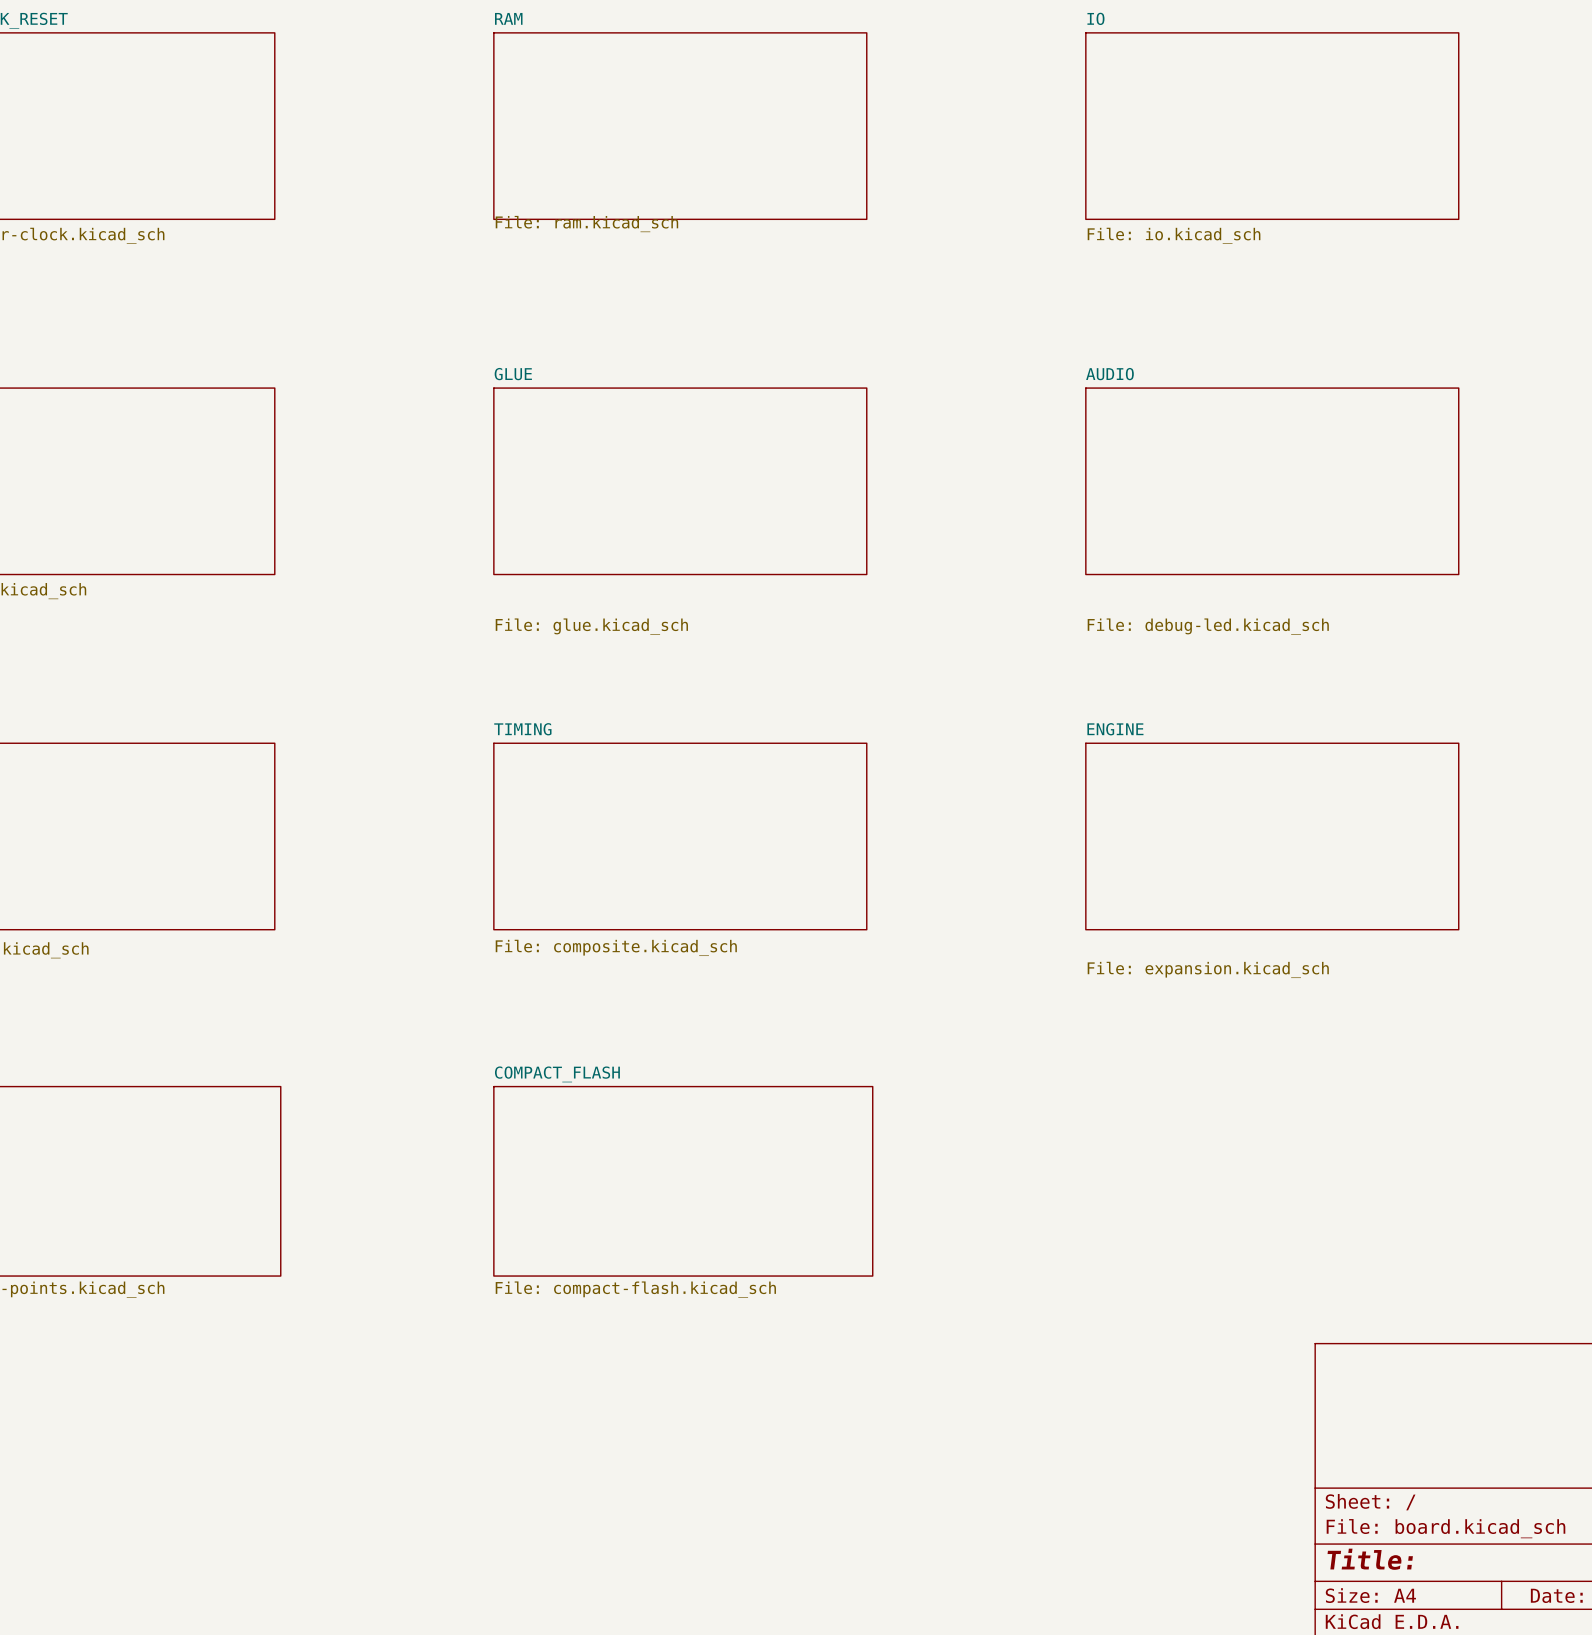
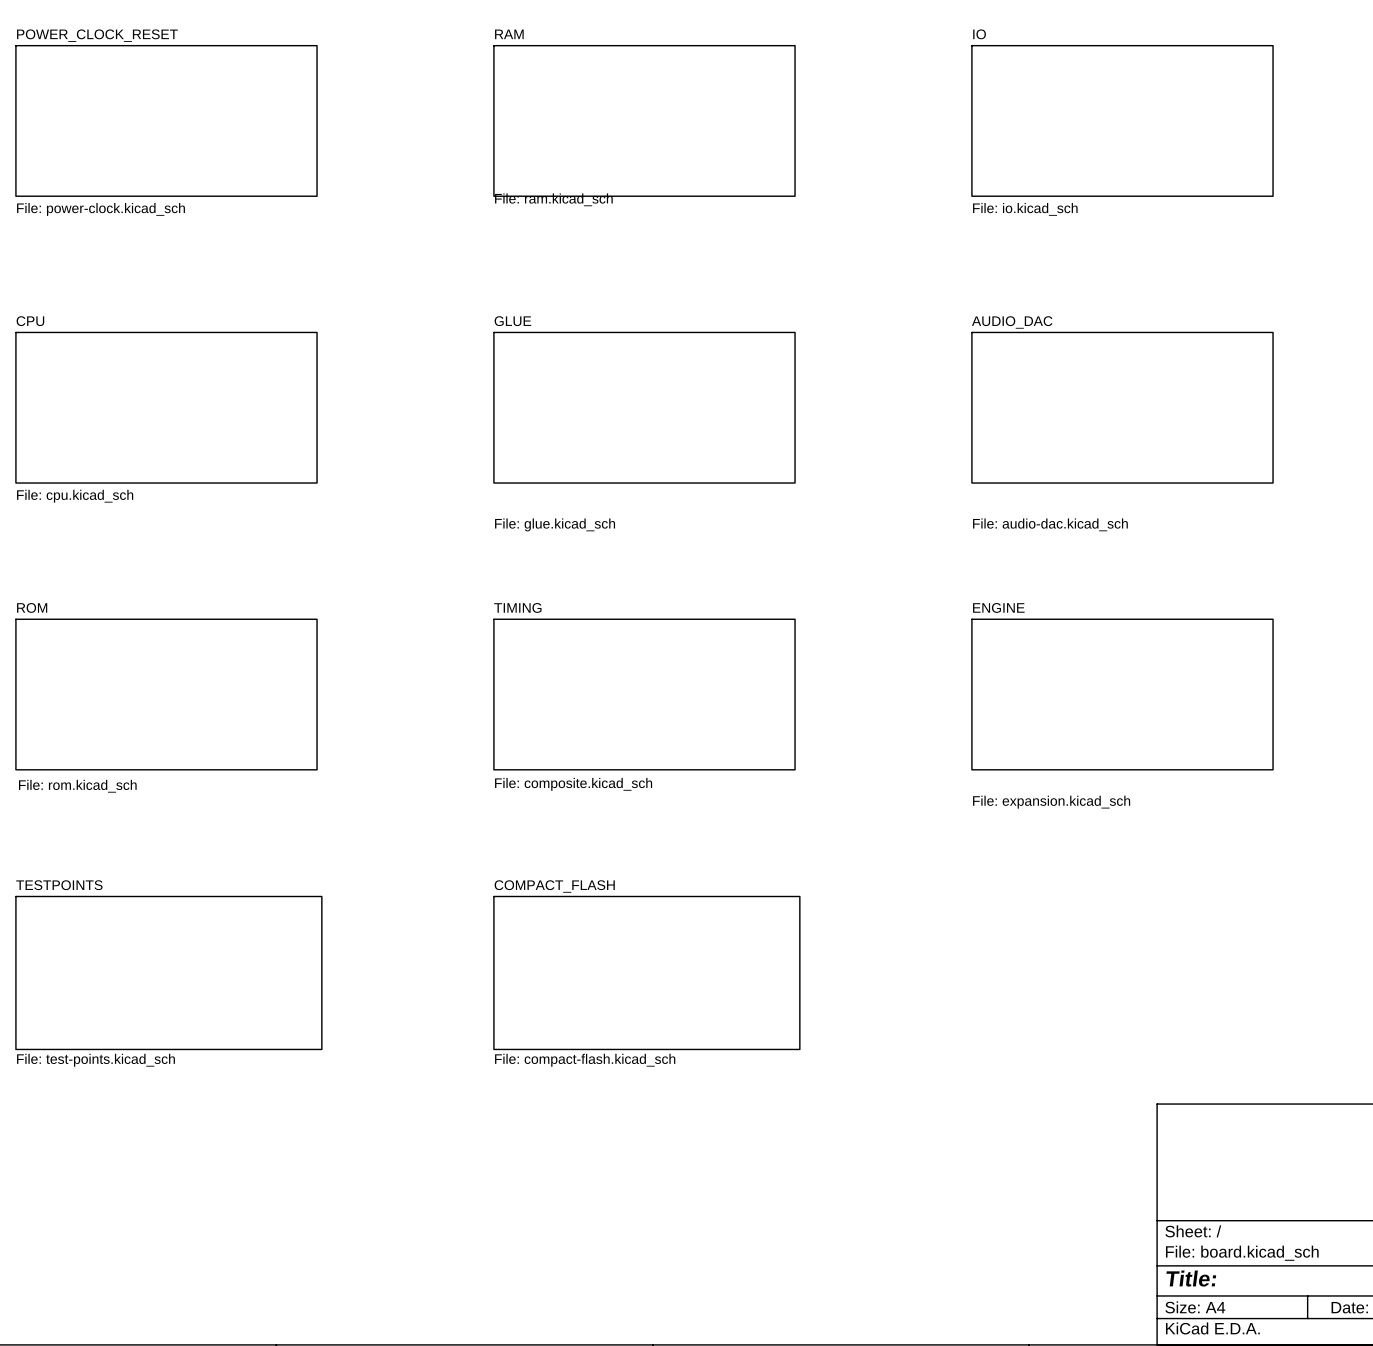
sheet AUDIO name: AUDIO (1109, 374) -> AUDIO_DAC (1012, 322)
sheet AUDIO value: File: debug-led.kicad_sch (1208, 626) -> File: audio-dac.kicad_sch (1050, 524)

